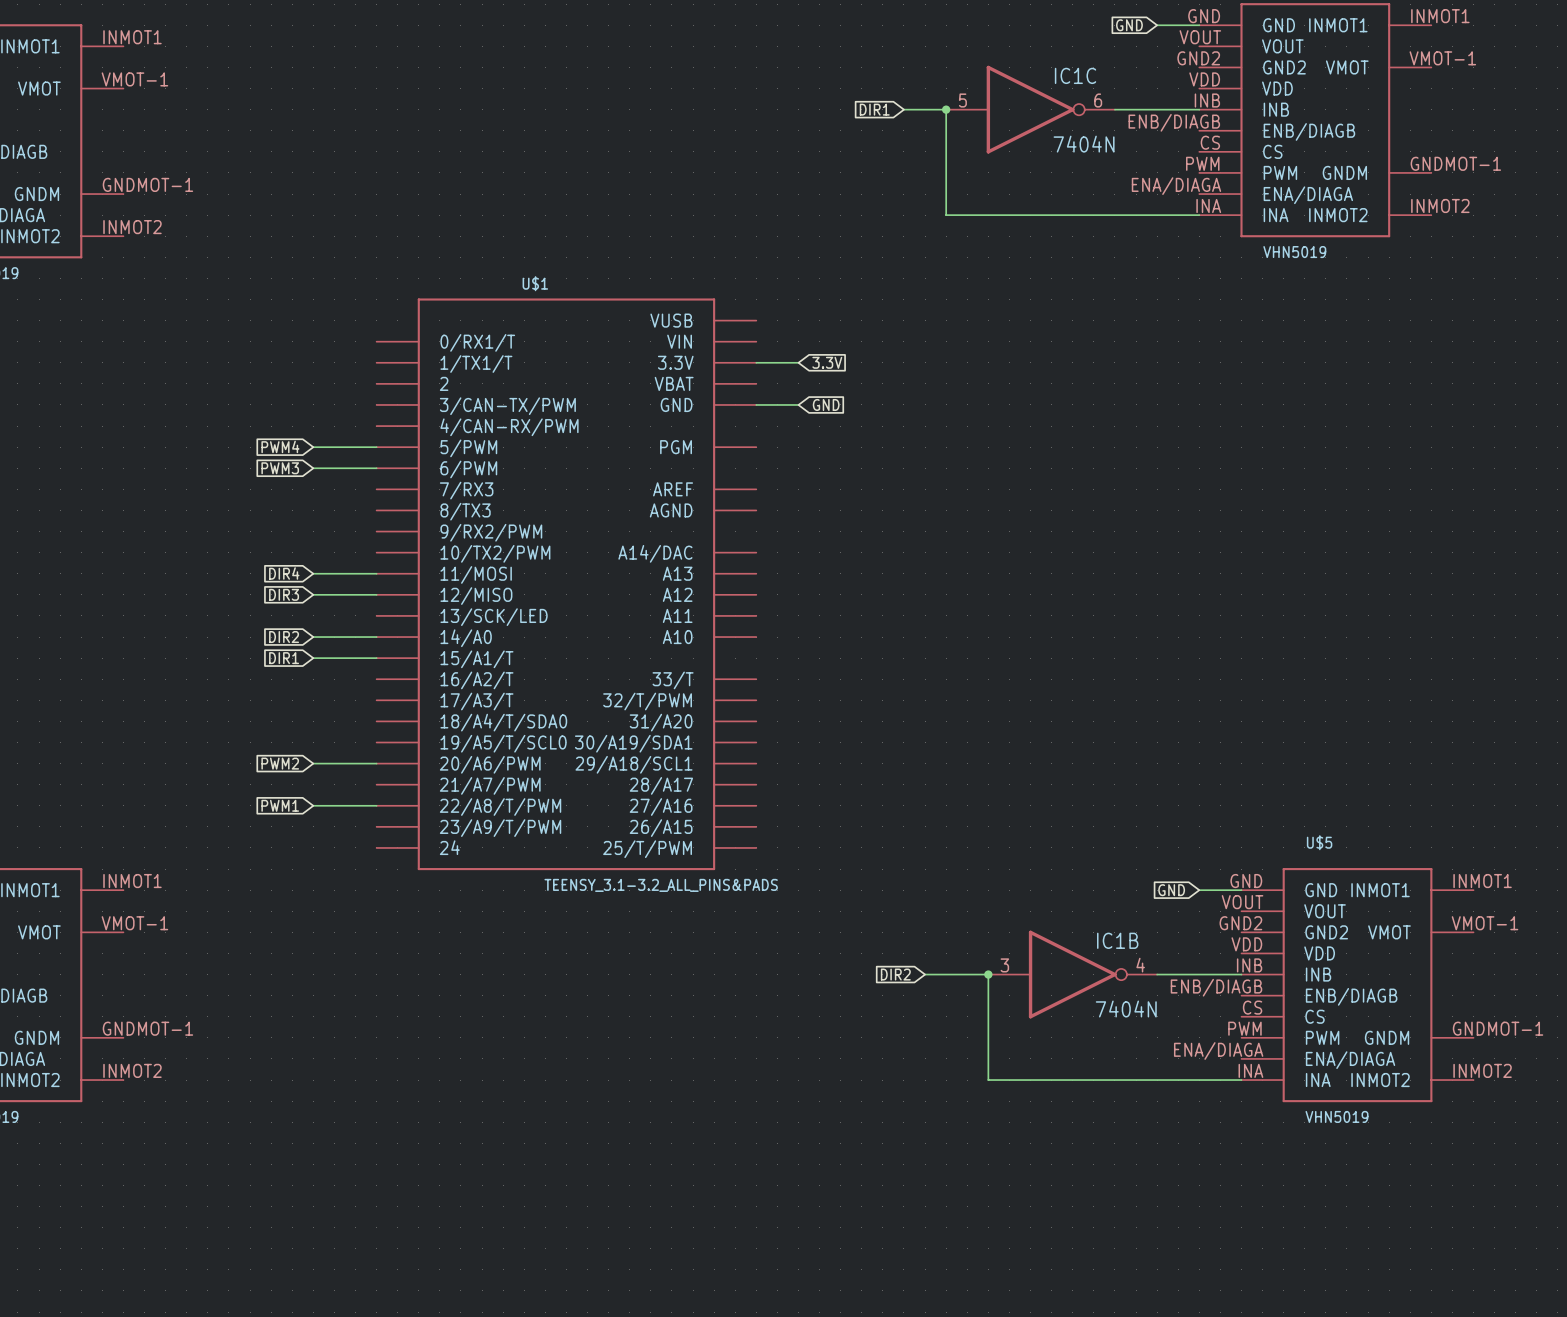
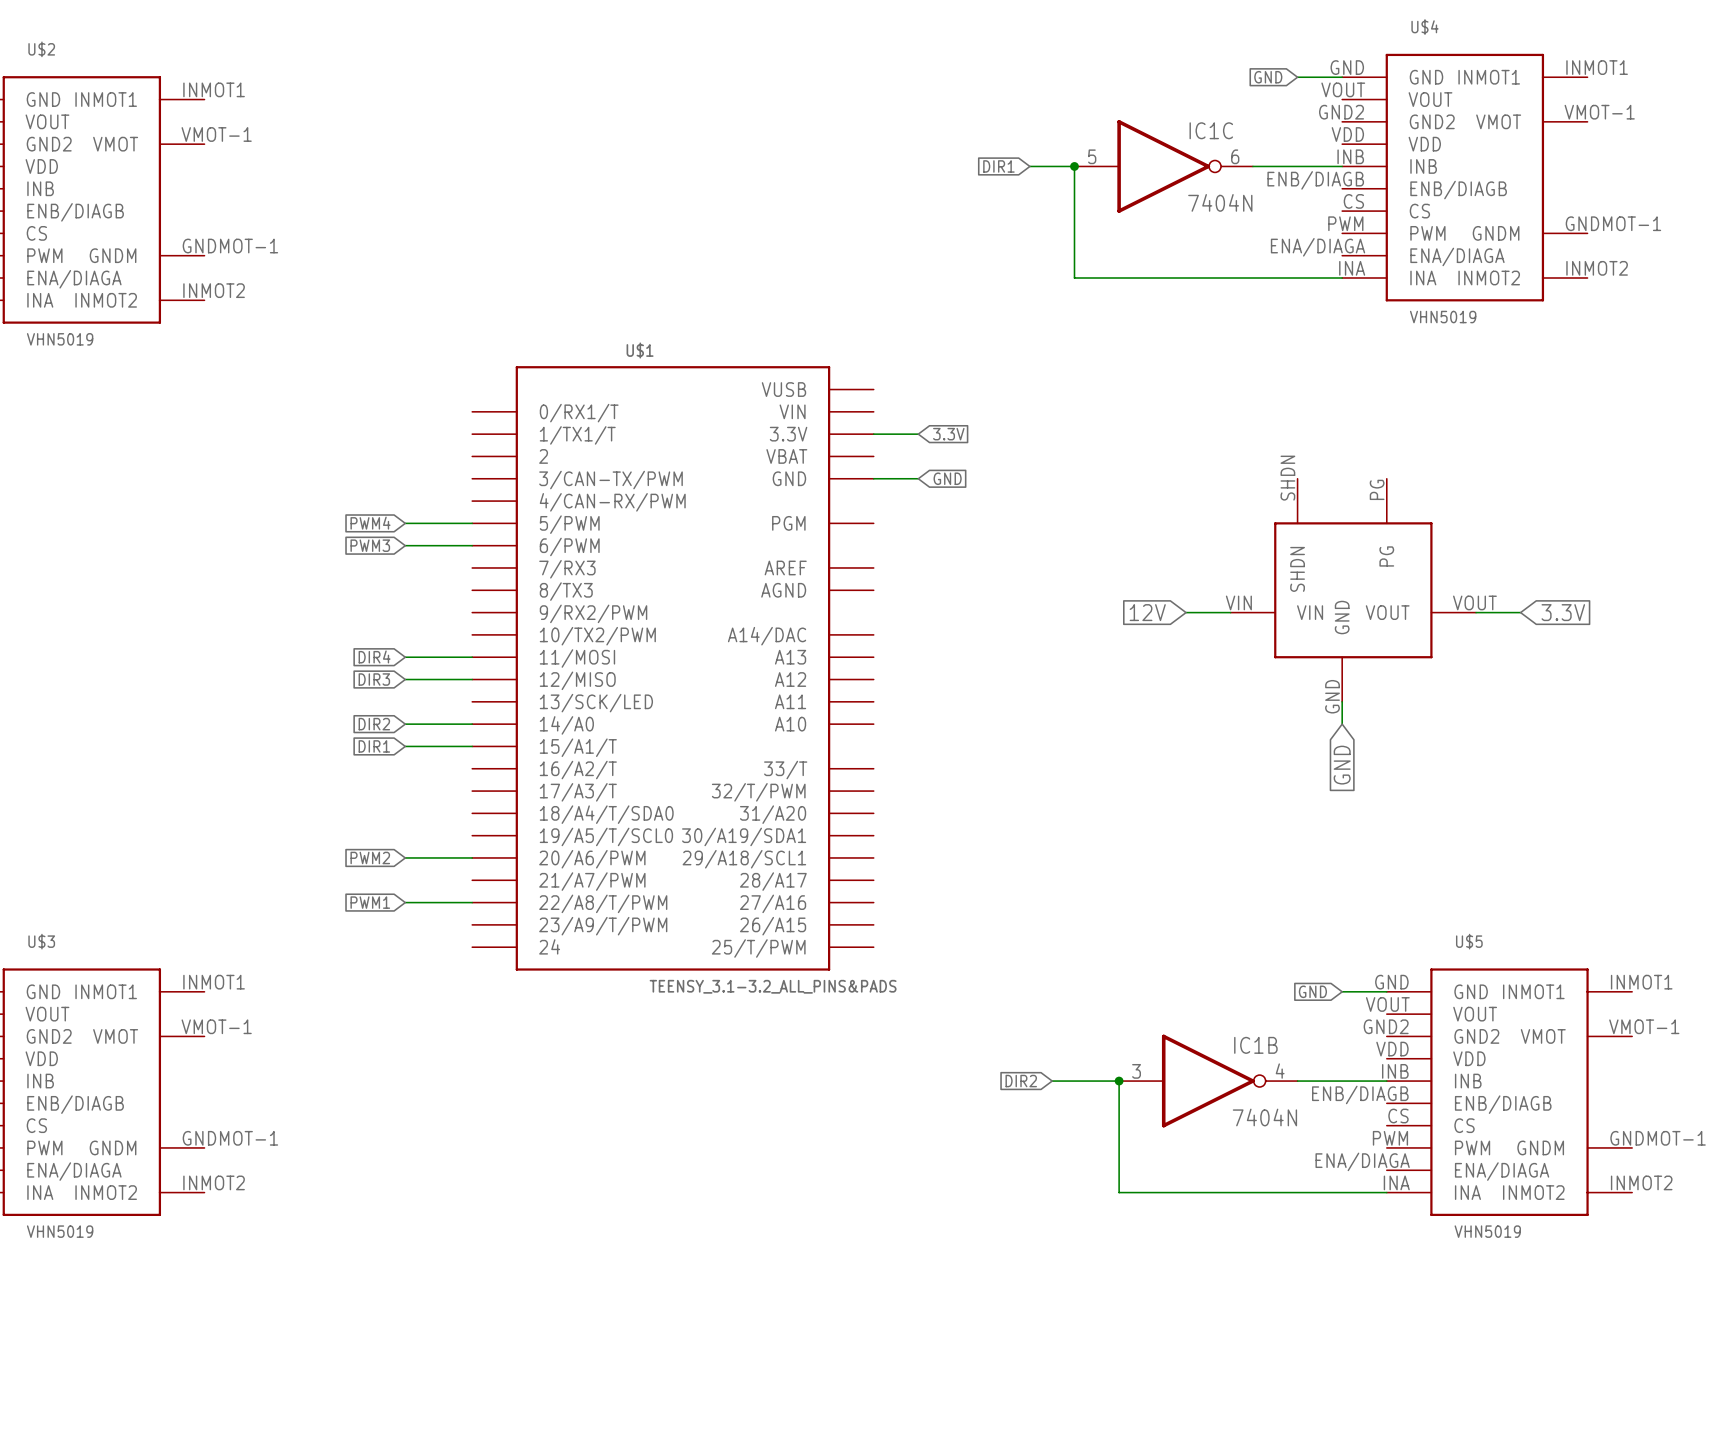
part: none -> (1353, 590)
global label: none -> 12V (1147, 612)
wire: none -> (1186, 612) (1230, 612)
wire: none -> (1476, 612) (1520, 612)
global label: none -> 3.3V (1563, 612)
wire: none -> (1342, 701) (1342, 724)
global label: none -> GND (1342, 765)

